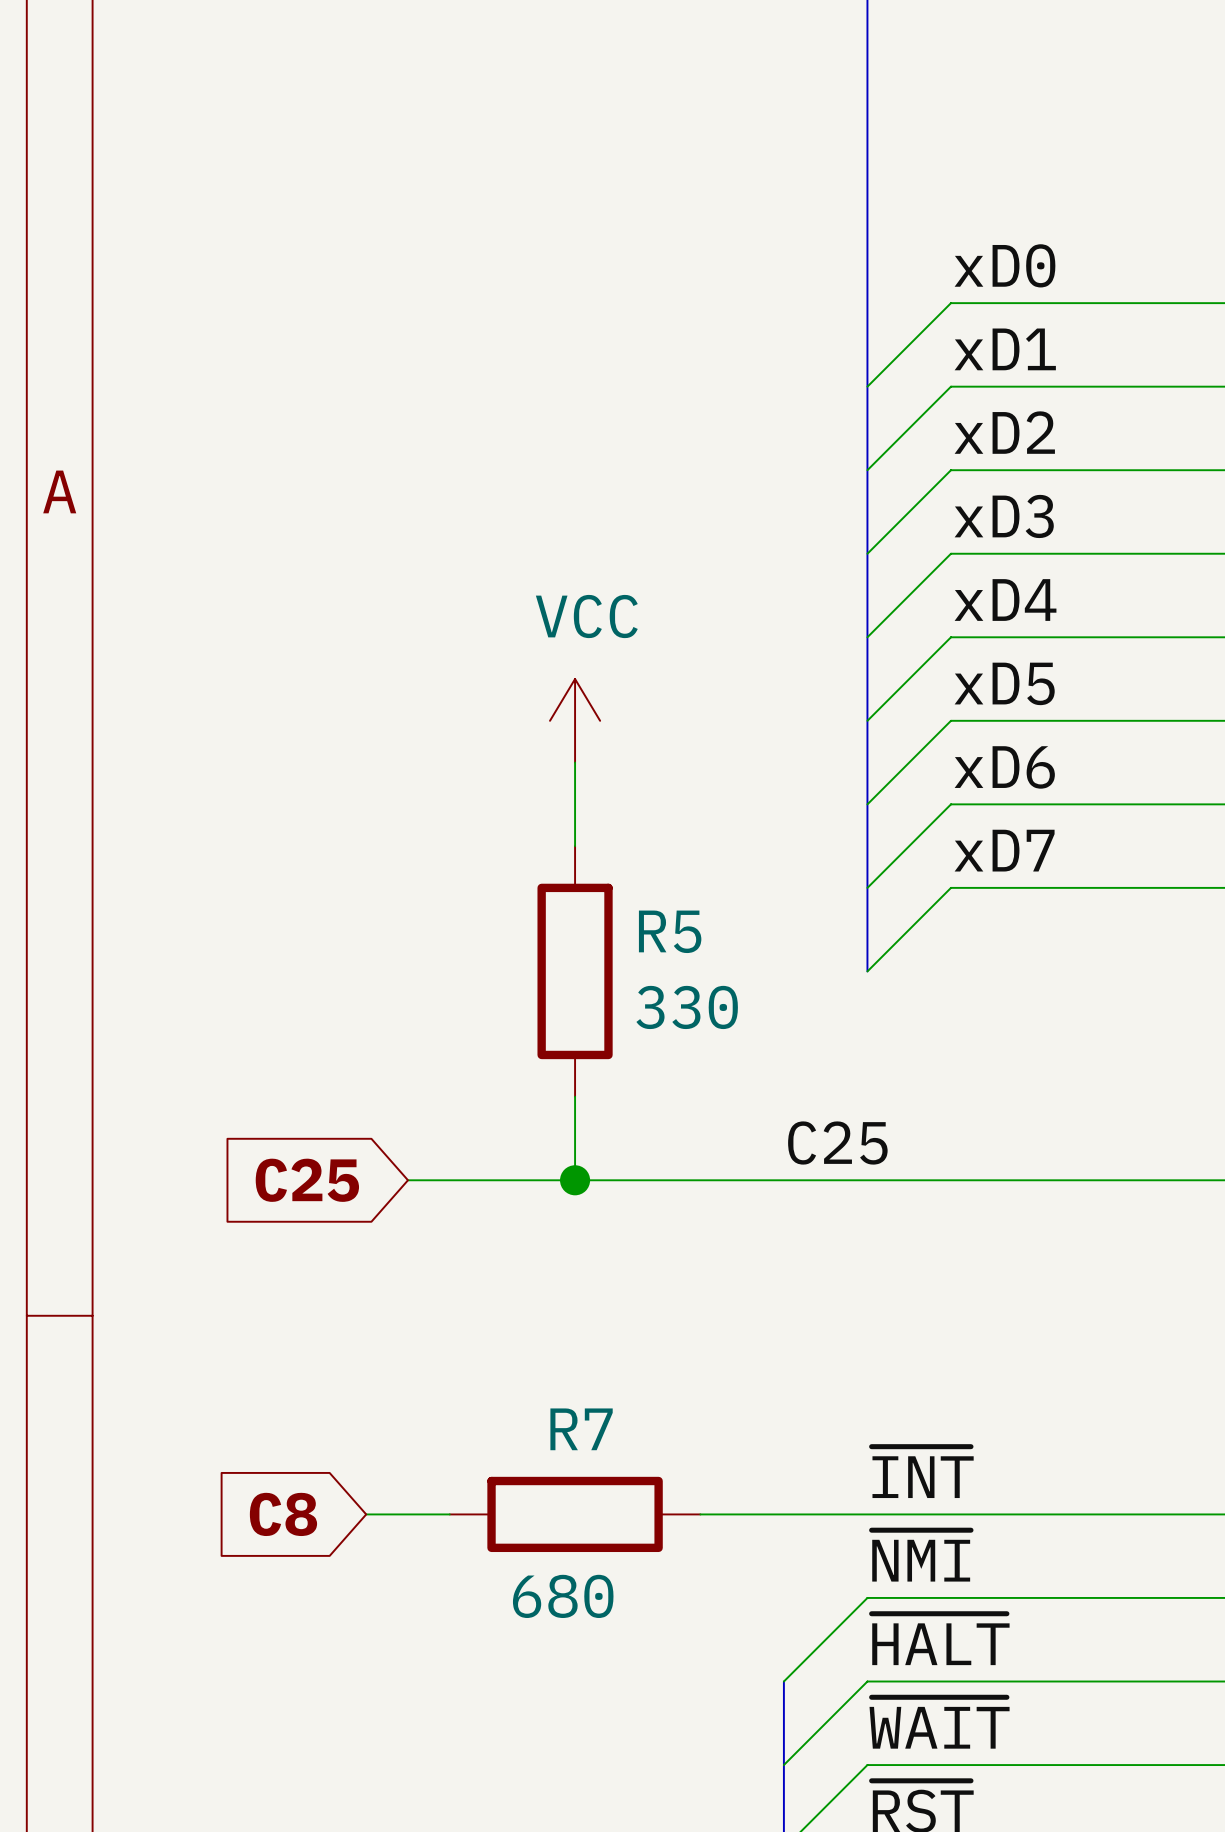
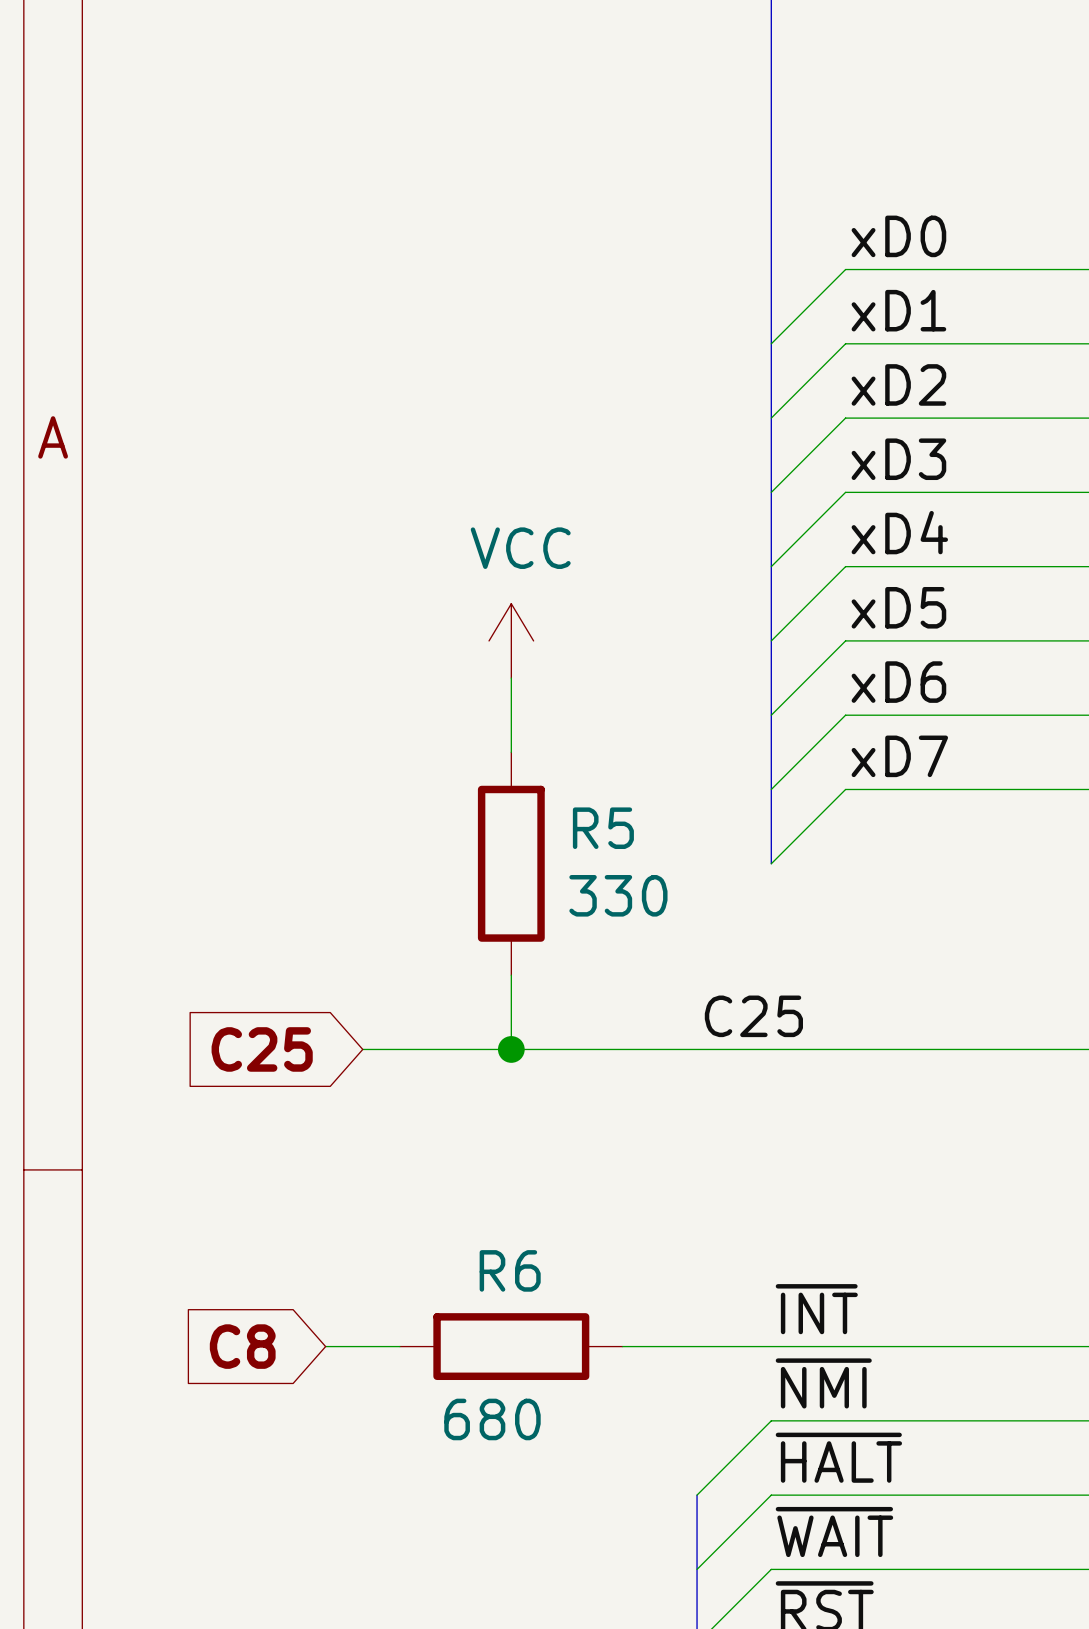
R7 name: R7 (581, 1429) -> R6 (510, 1270)

